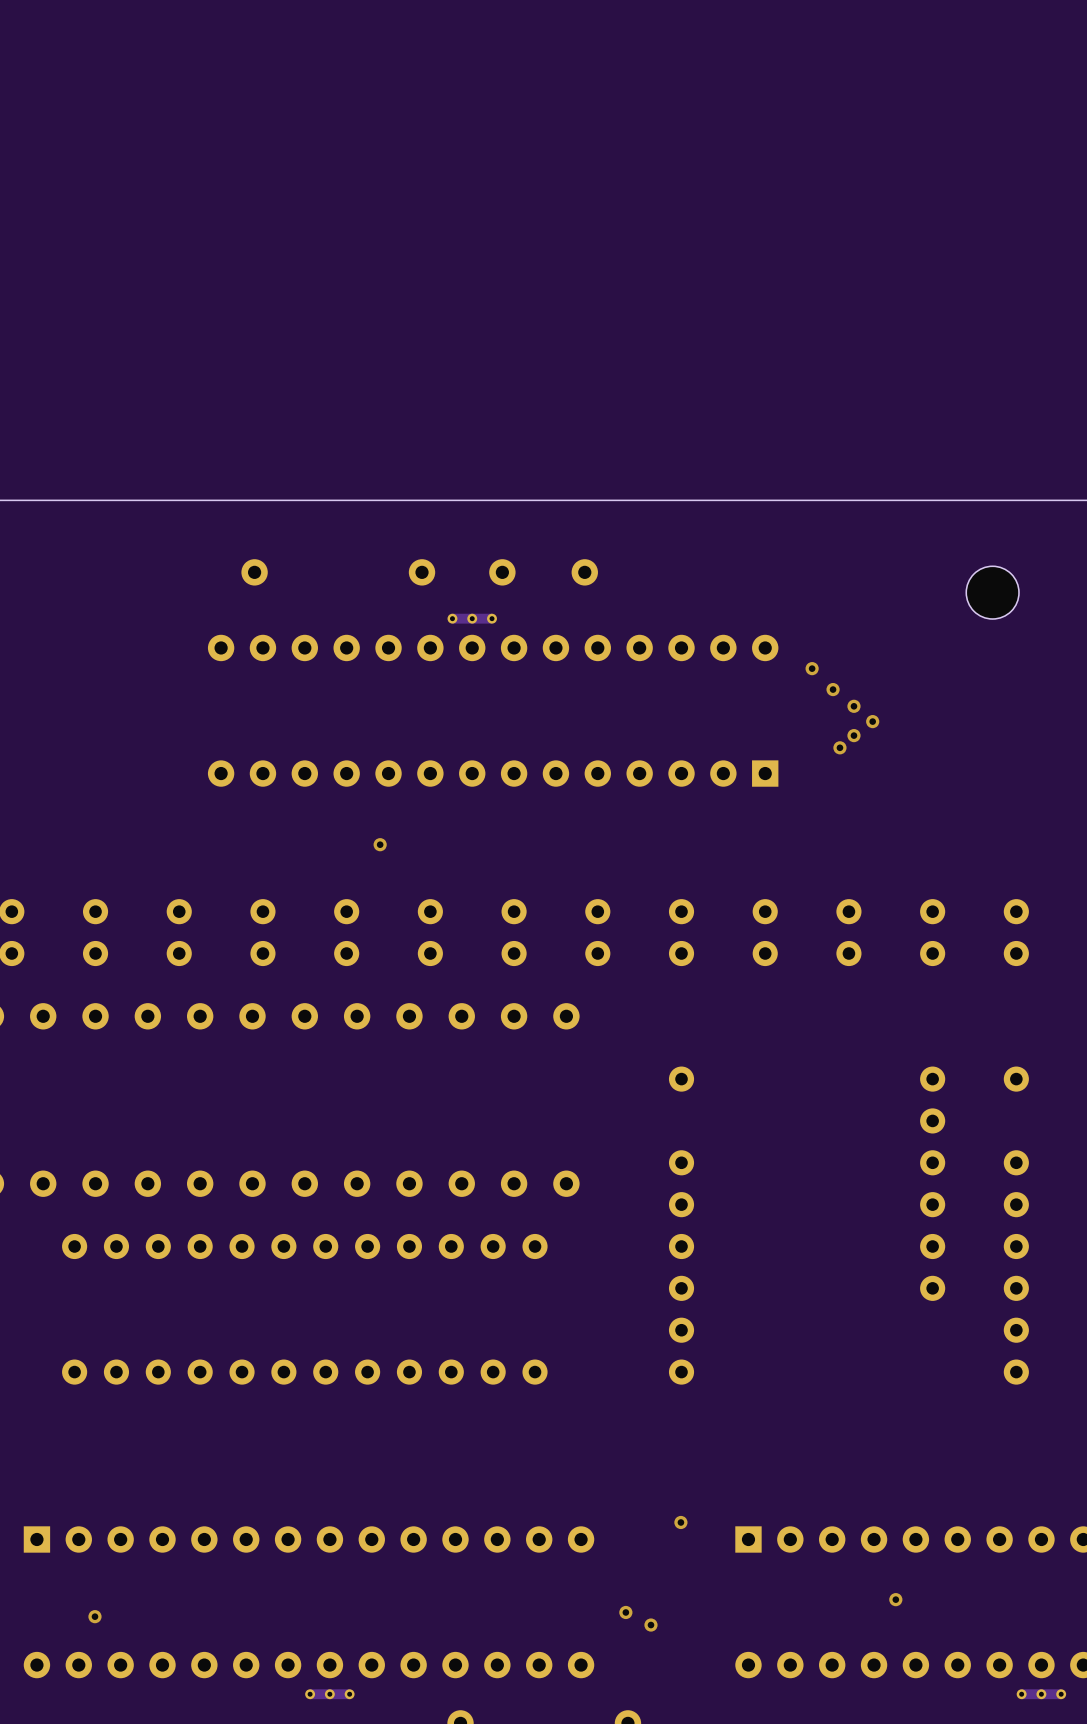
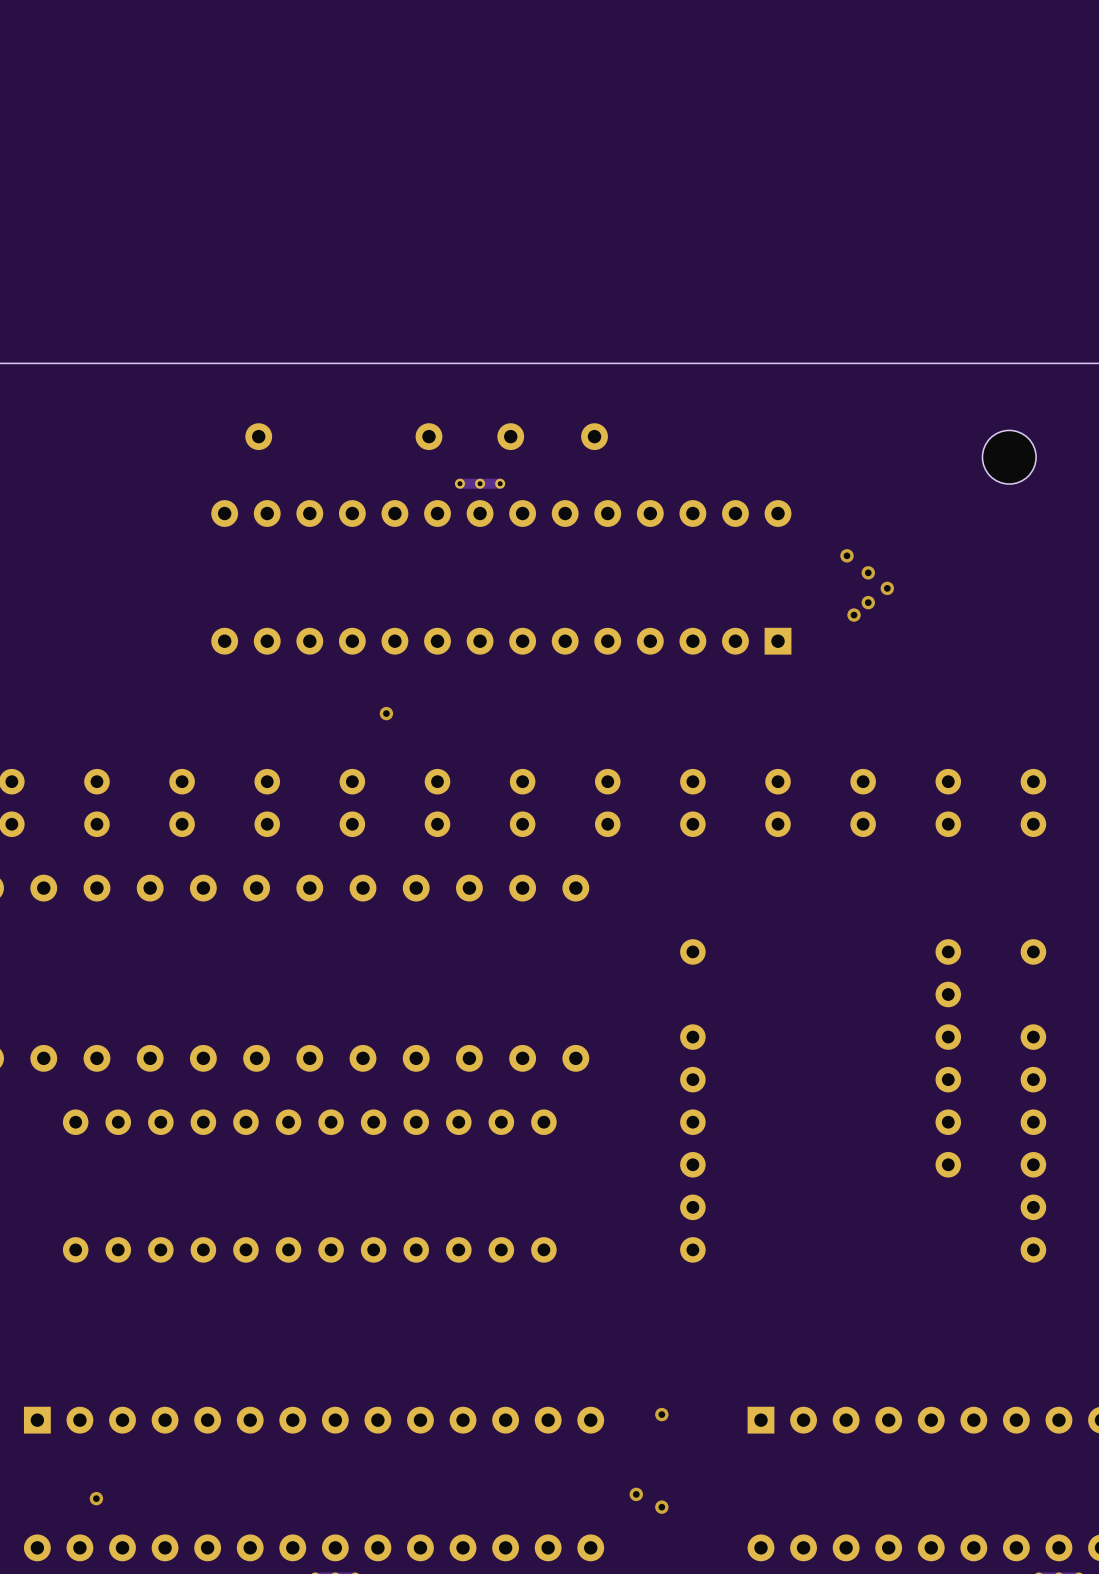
via: (812, 668) -> none
via position: (680, 1522) -> (661, 1414)
via: (895, 1599) -> none

